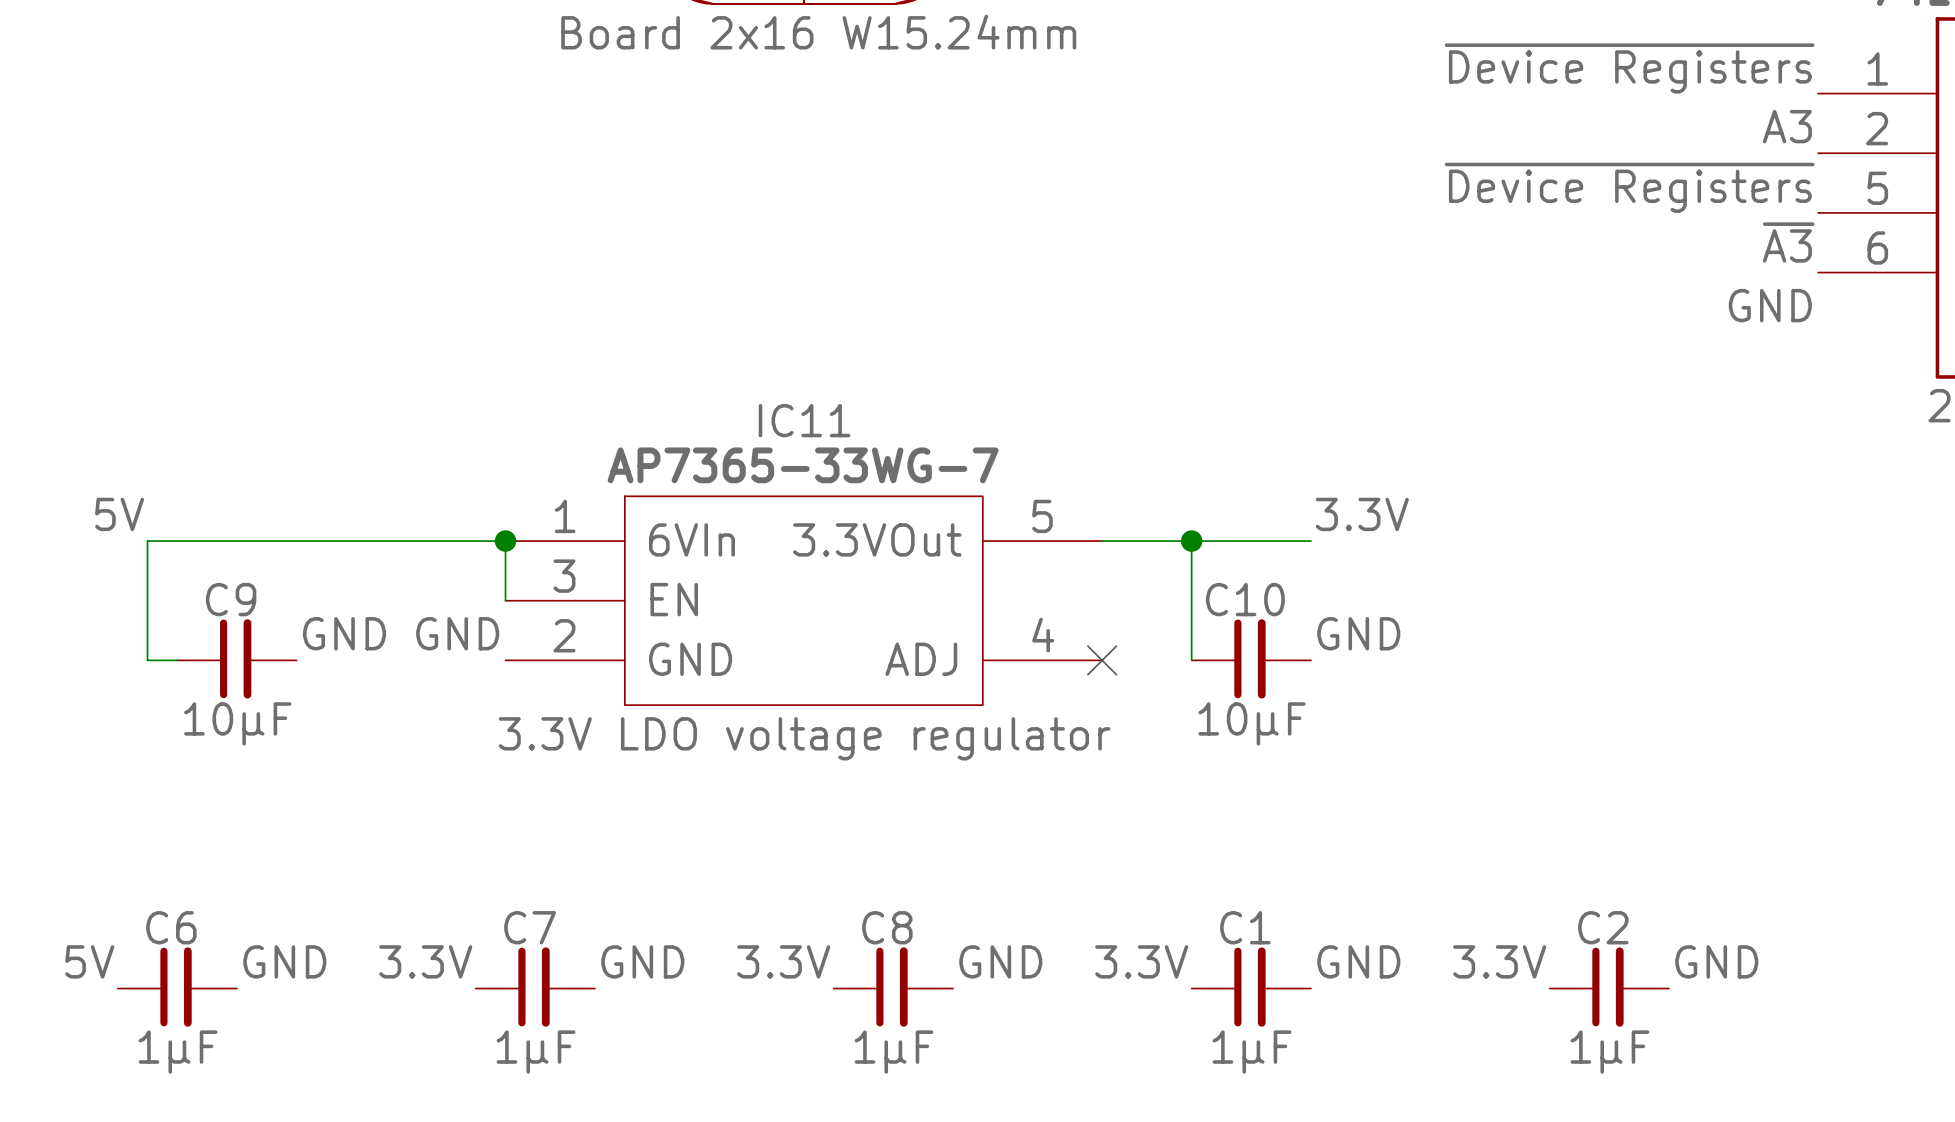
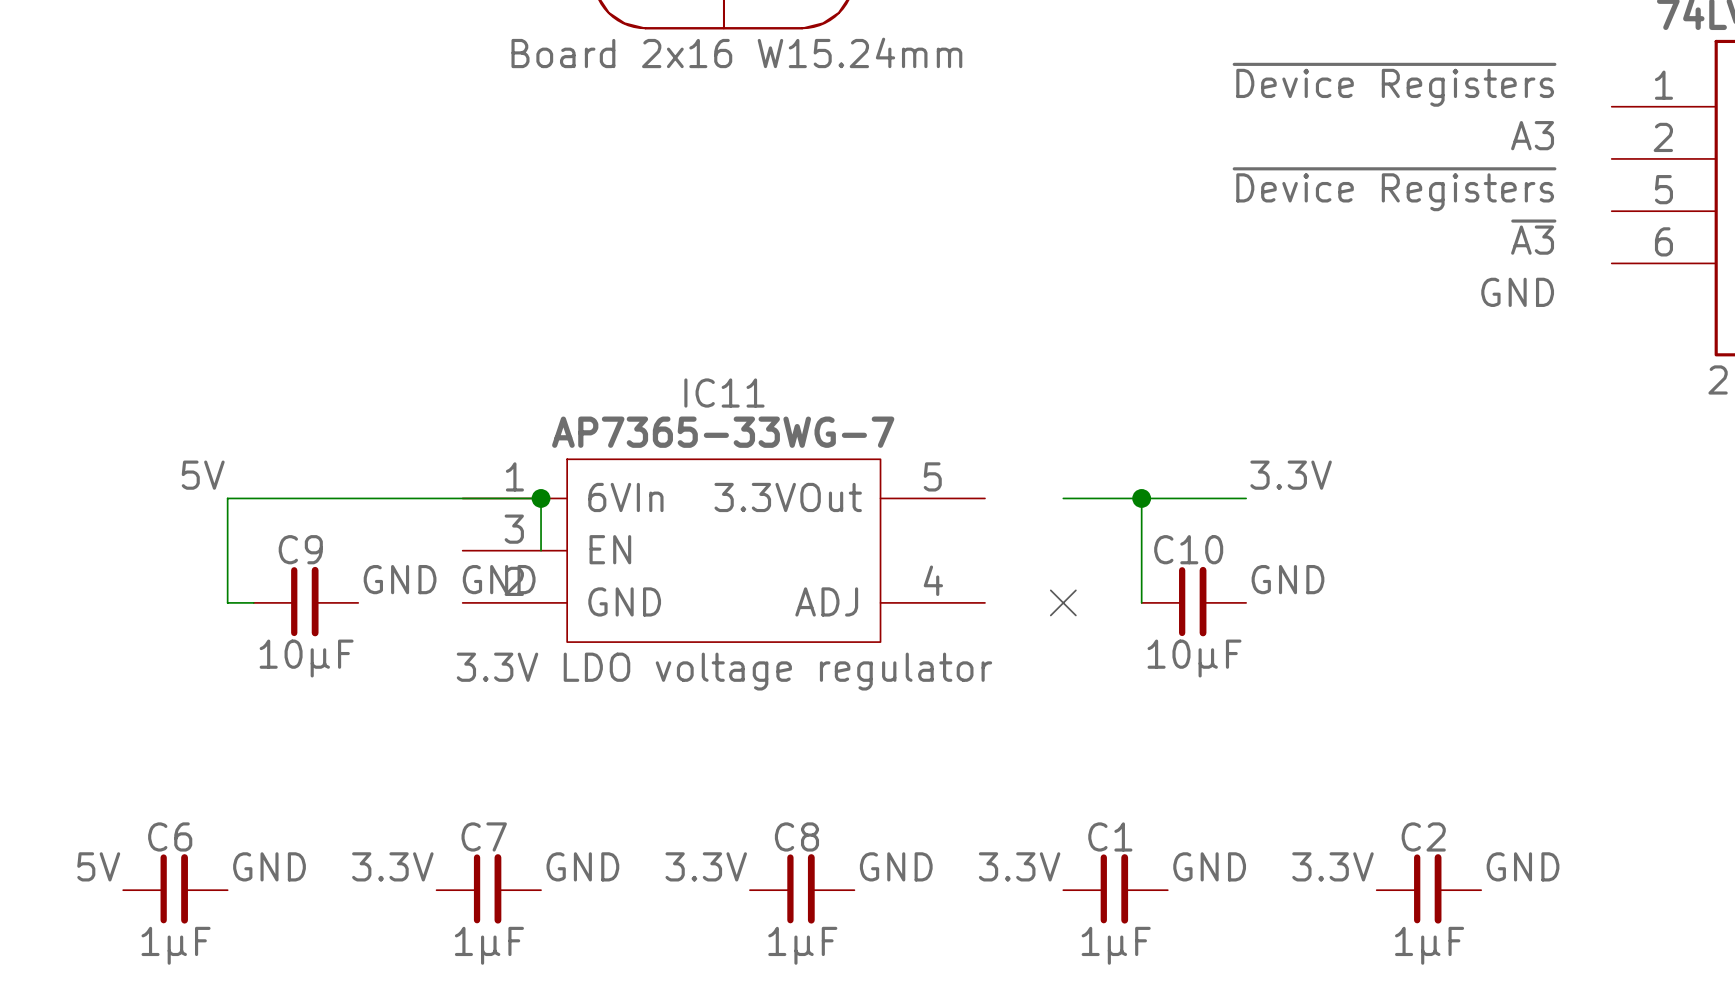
label position: ~{Device Registers} (1629, 68) -> ~{Device Registers} (1394, 84)
label position: A3 (1787, 126) -> A3 (1532, 135)
label position: ~{Device Registers} (1629, 187) -> ~{Device Registers} (1394, 189)
label position: ~{A3} (1788, 242) -> ~{A3} (1533, 237)
label position: GND (1770, 305) -> GND (1517, 292)
label position: 5V (119, 514) -> 5V (203, 475)
label position: 3.3V (1362, 514) -> 3.3V (1291, 475)
wire: (237, 541) (147, 541) (147, 660) (177, 660) -> (227, 498) (227, 602) (253, 602)
wire: (505, 541) (505, 600) -> (462, 498) (541, 498) (541, 550)
junction position: (505, 541) -> (541, 498)
wire: (1102, 541) (1191, 541) (1191, 660) -> none
junction position: (1191, 541) -> (1141, 498)
wire: none -> (1141, 498) (1141, 602)
wire: none -> (1167, 498) (1246, 498)
label: GND (344, 633) -> none
label: none -> GND (400, 579)
label: GND (457, 633) -> none
label: none -> GND (499, 579)
label position: GND (1358, 633) -> GND (1287, 579)
C9 position: (237, 658) -> (305, 601)
C10 position: (1251, 658) -> (1193, 601)
no-connect mark position: (1102, 660) -> (1063, 602)

